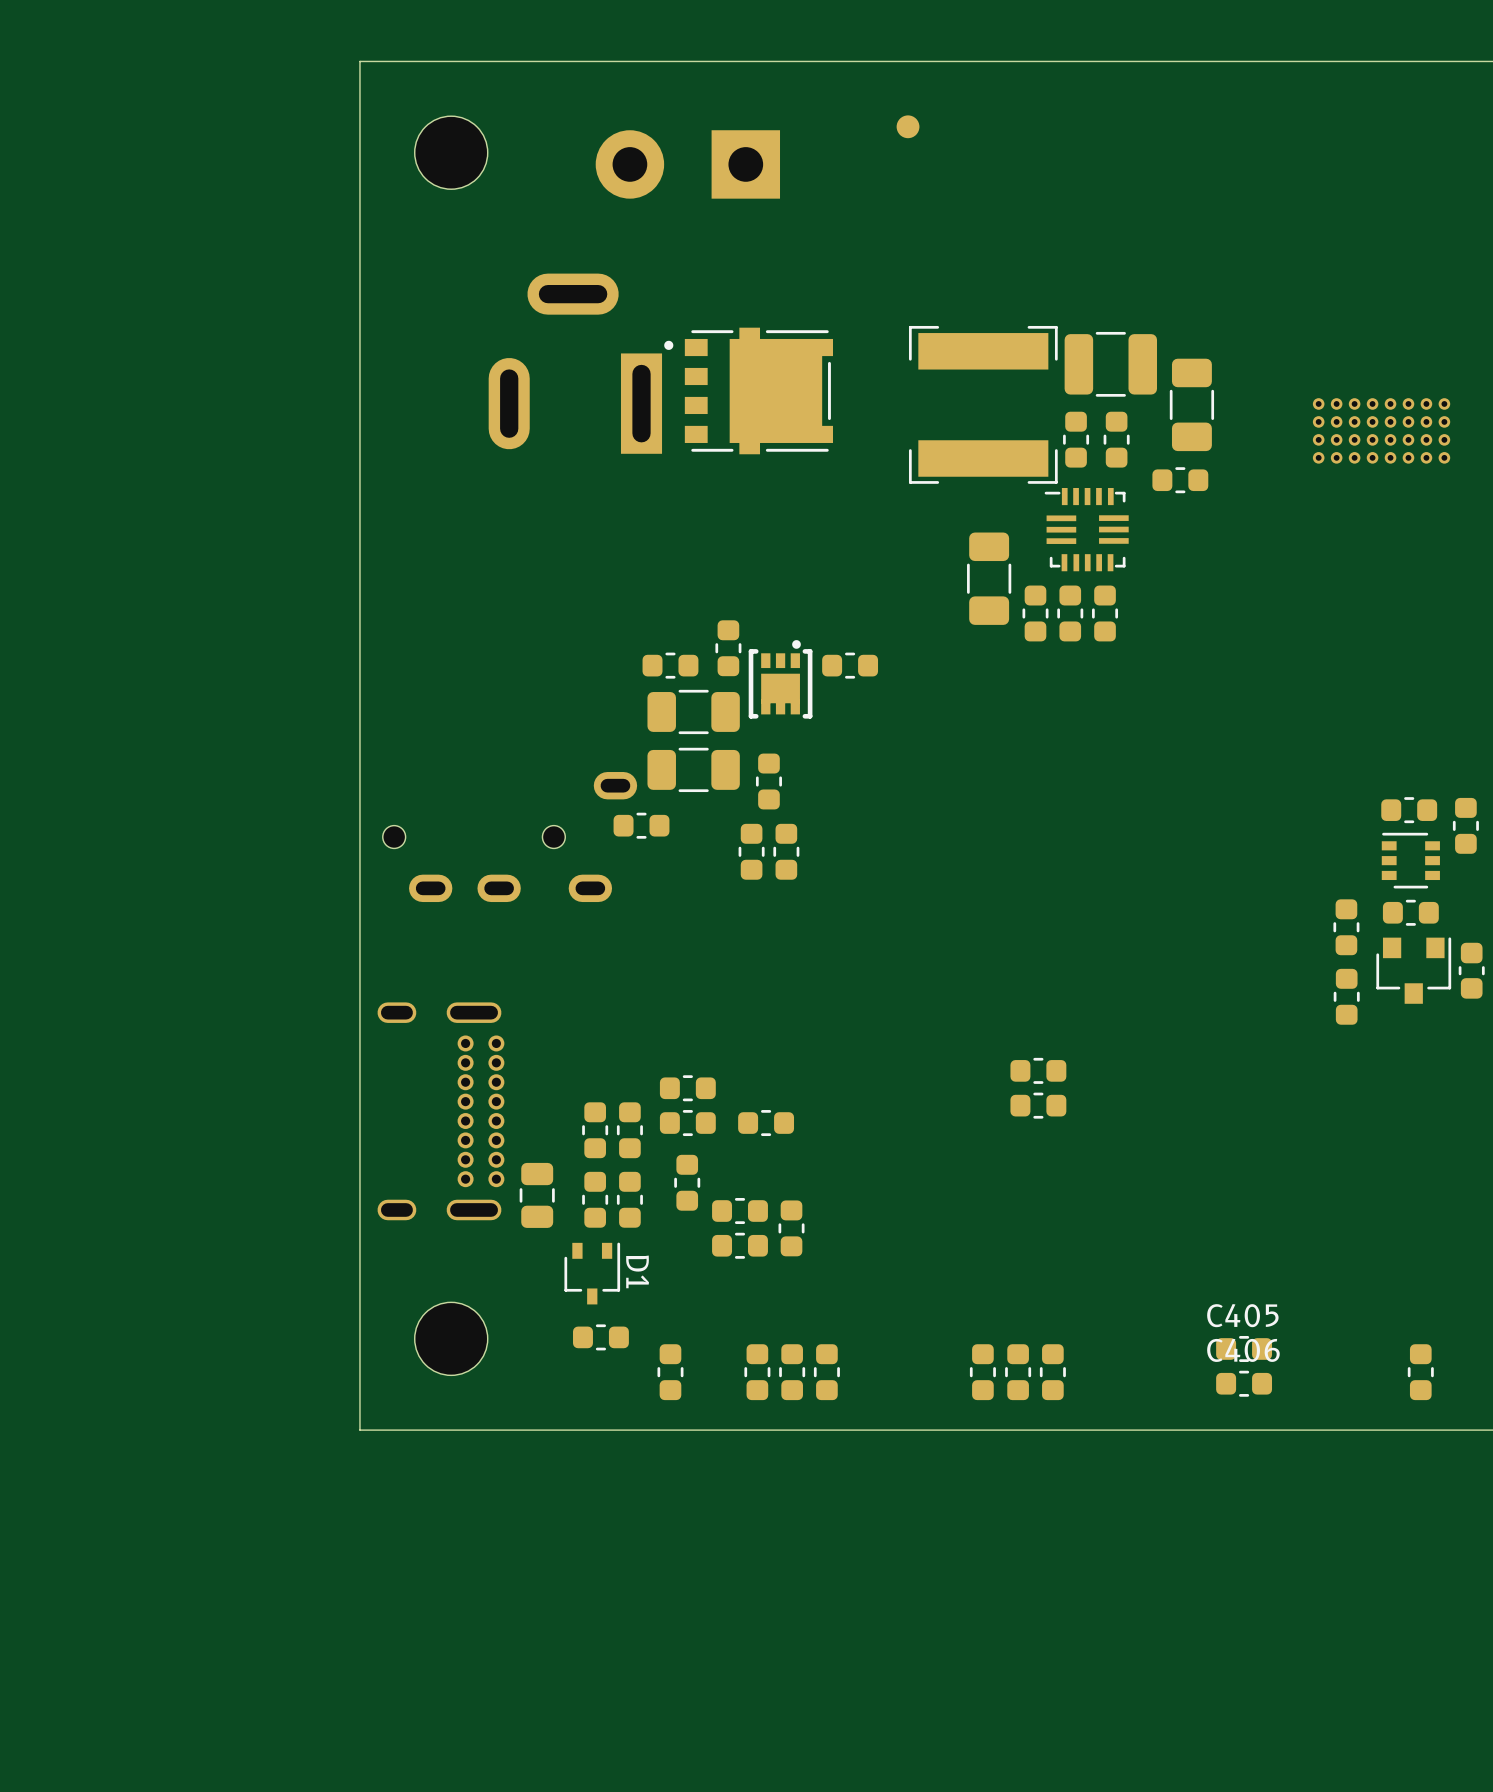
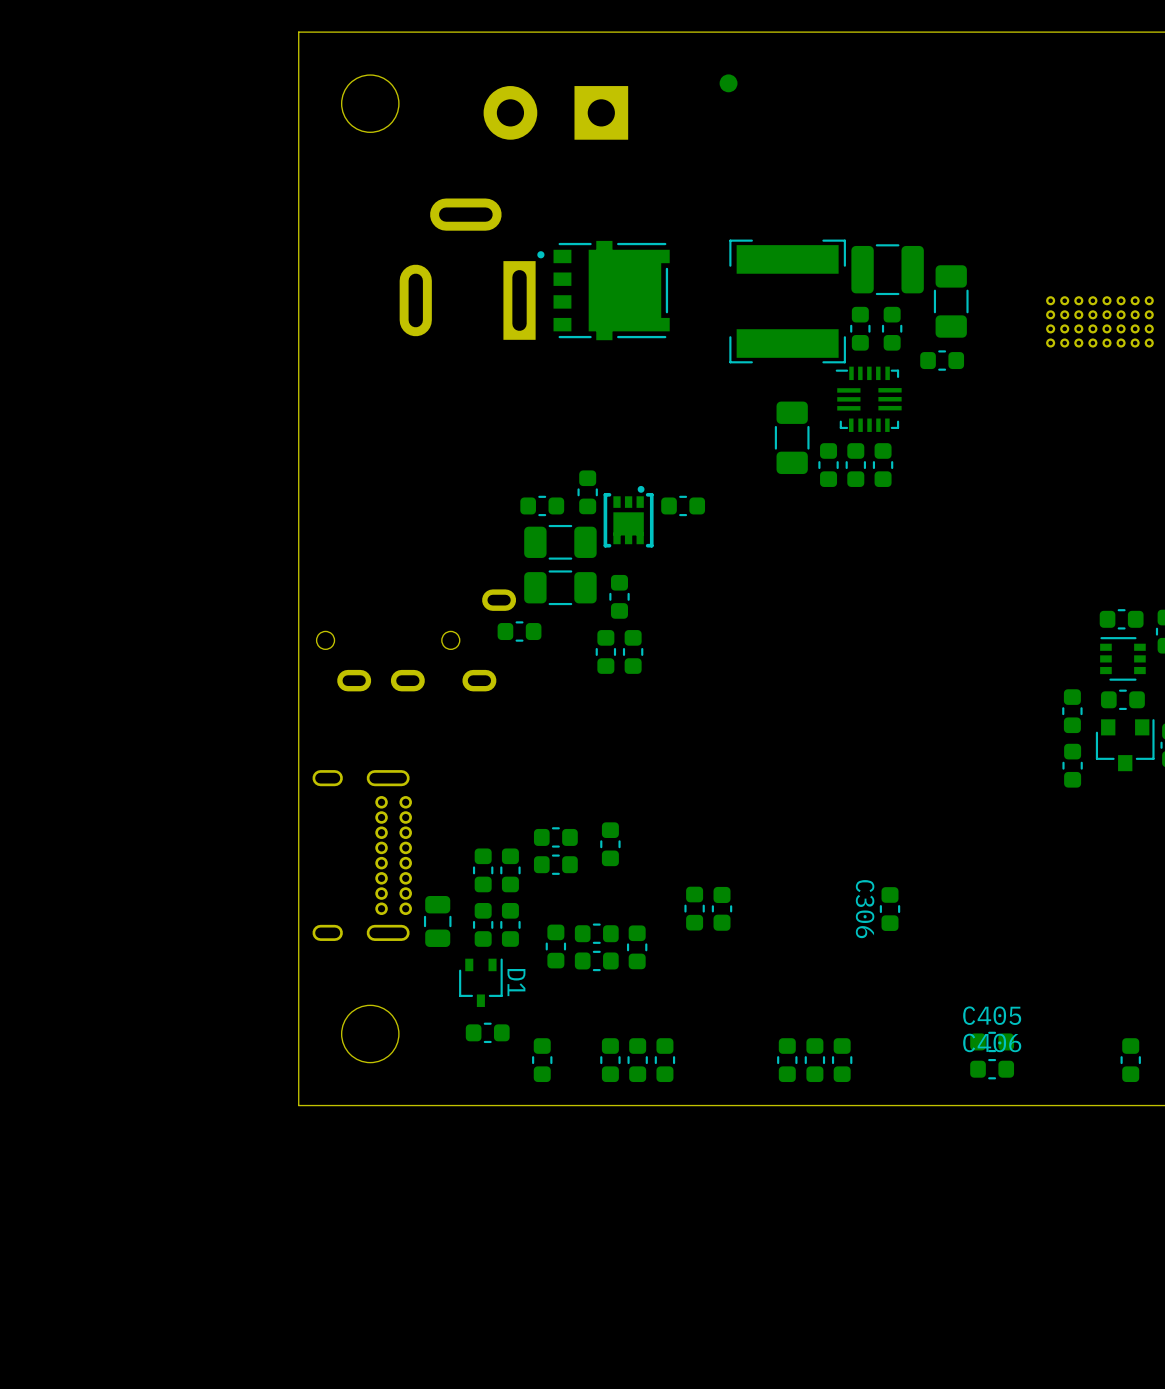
part: (1038, 1070) -> none
part: (1038, 1105) -> none
part rotation: 0° (766, 1123) -> 90° clockwise (610, 844)
part: none -> (694, 908)
part: none -> (722, 908)
C306: none -> (890, 909)
part position: (687, 1182) -> (555, 946)

